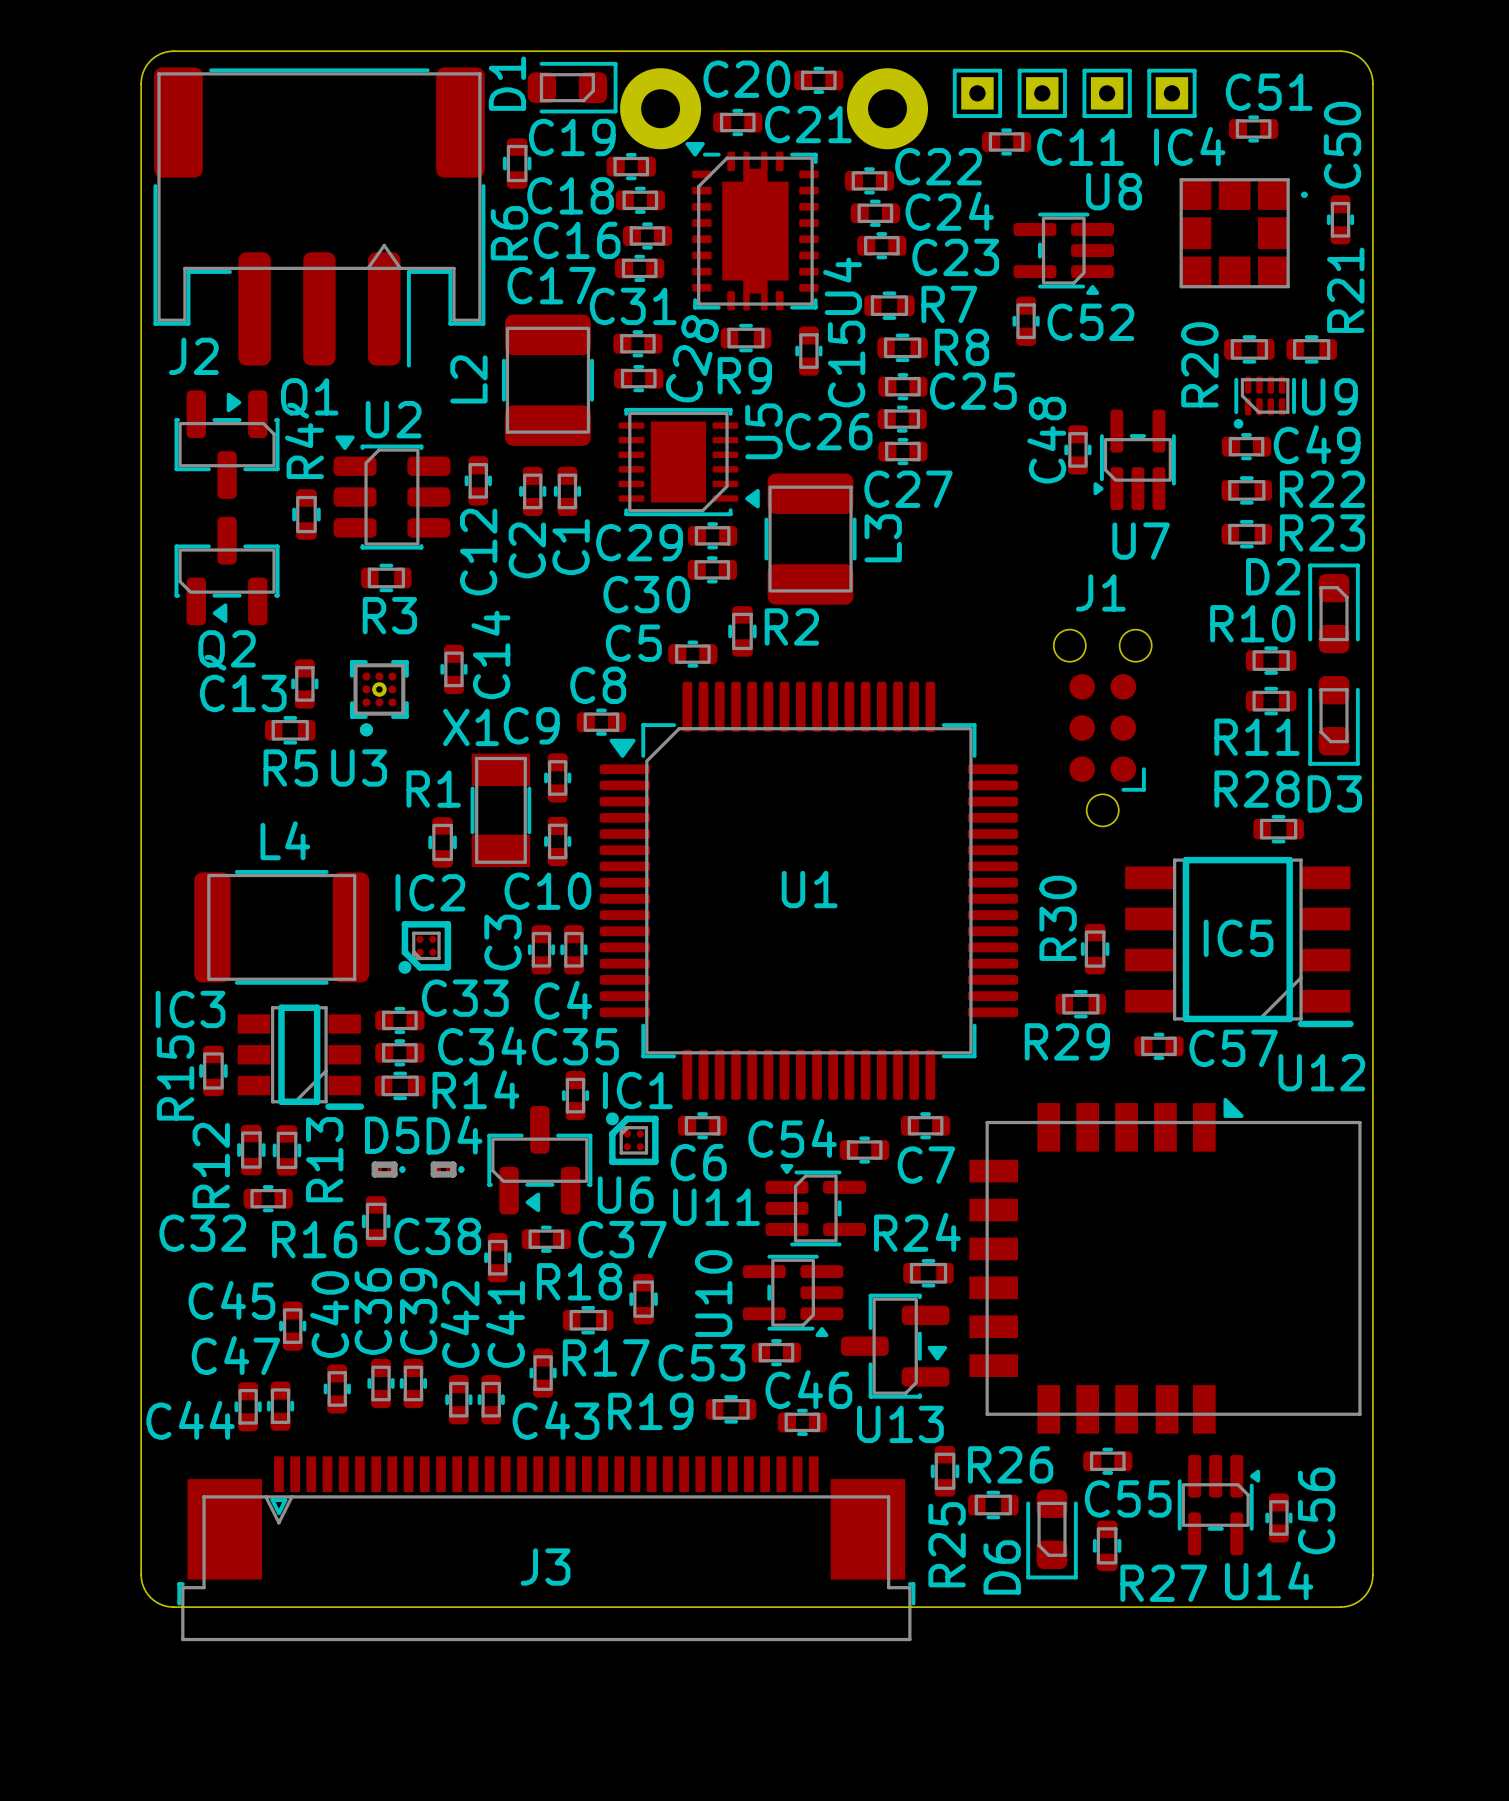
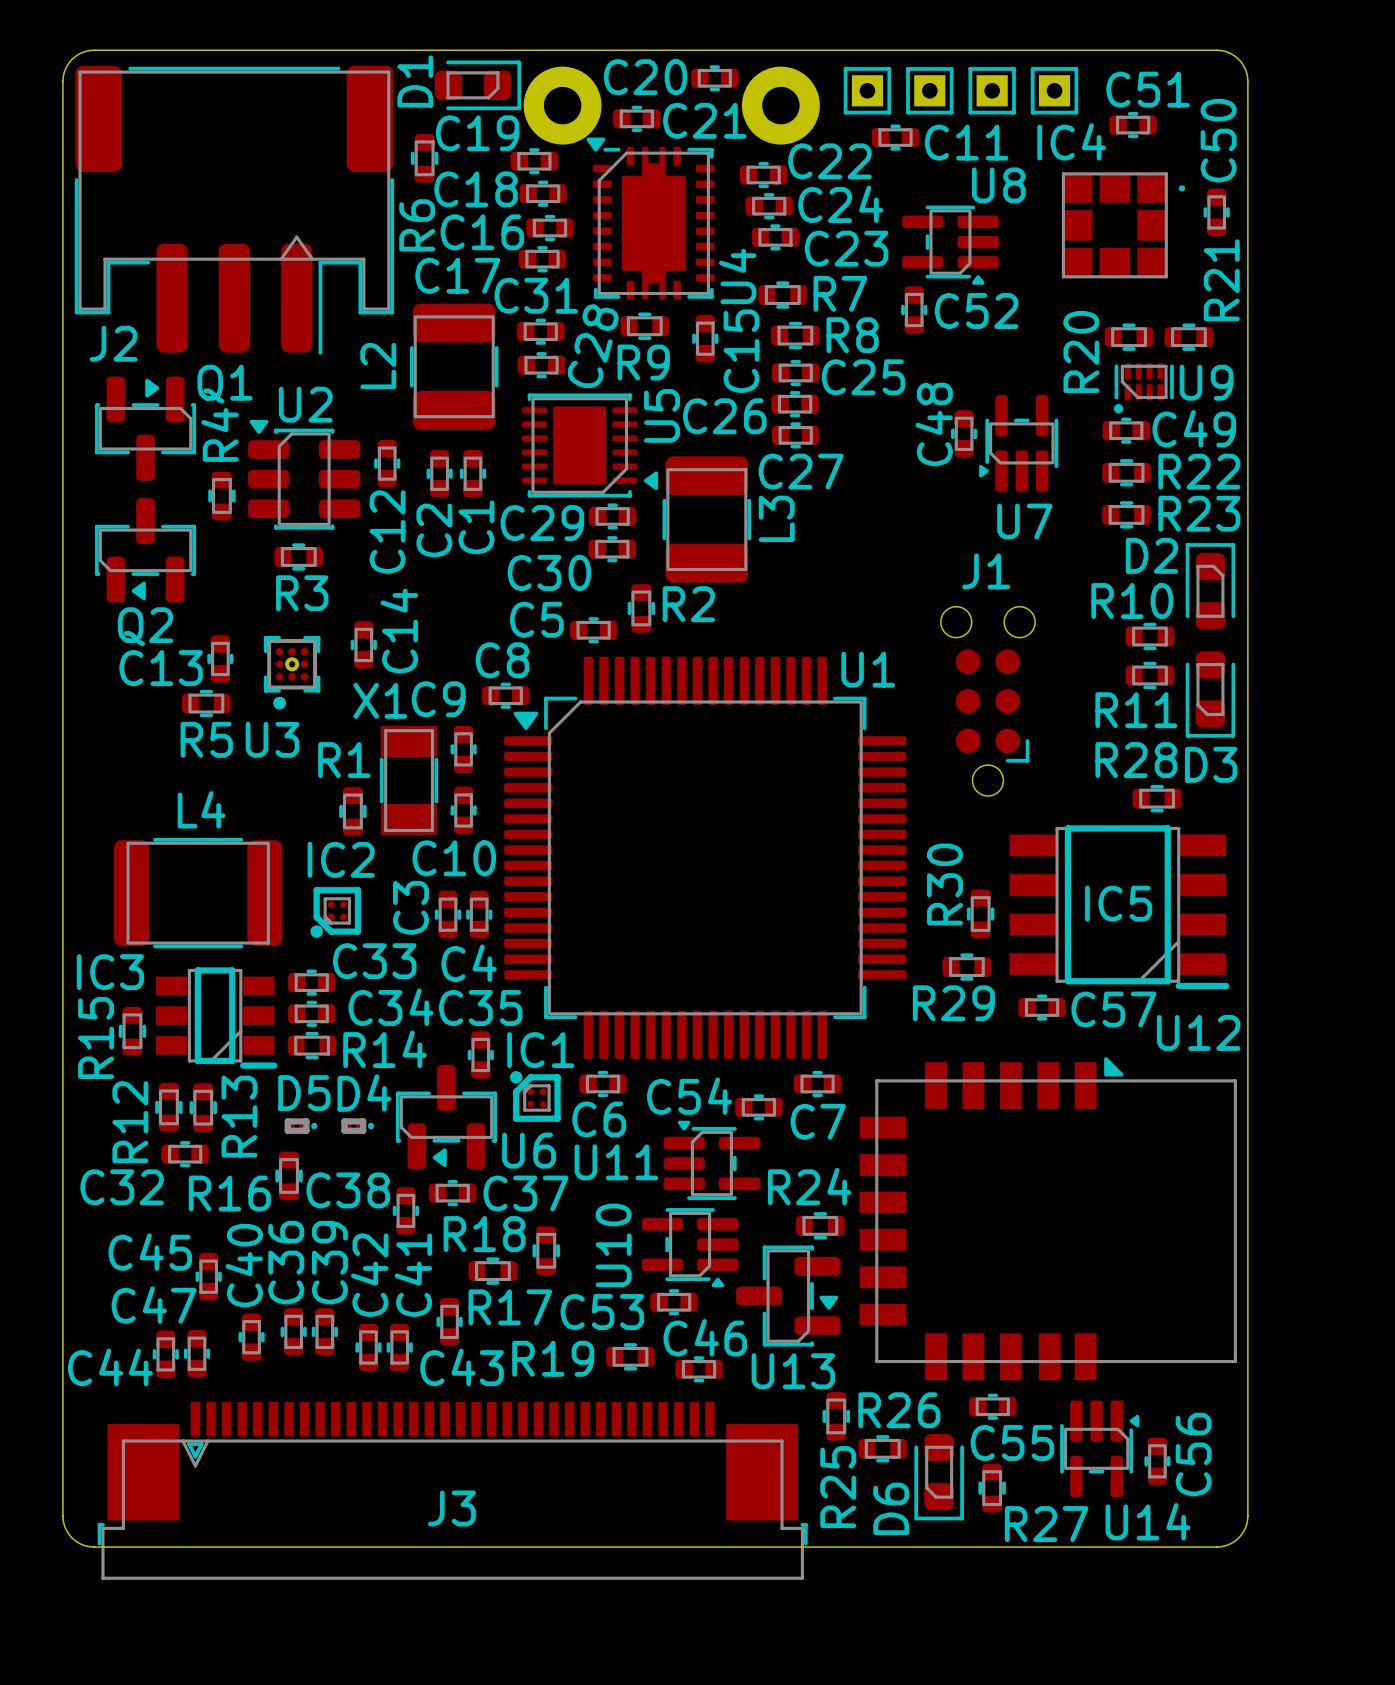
U1 name position: U1 (809, 889) -> U1 (868, 669)

